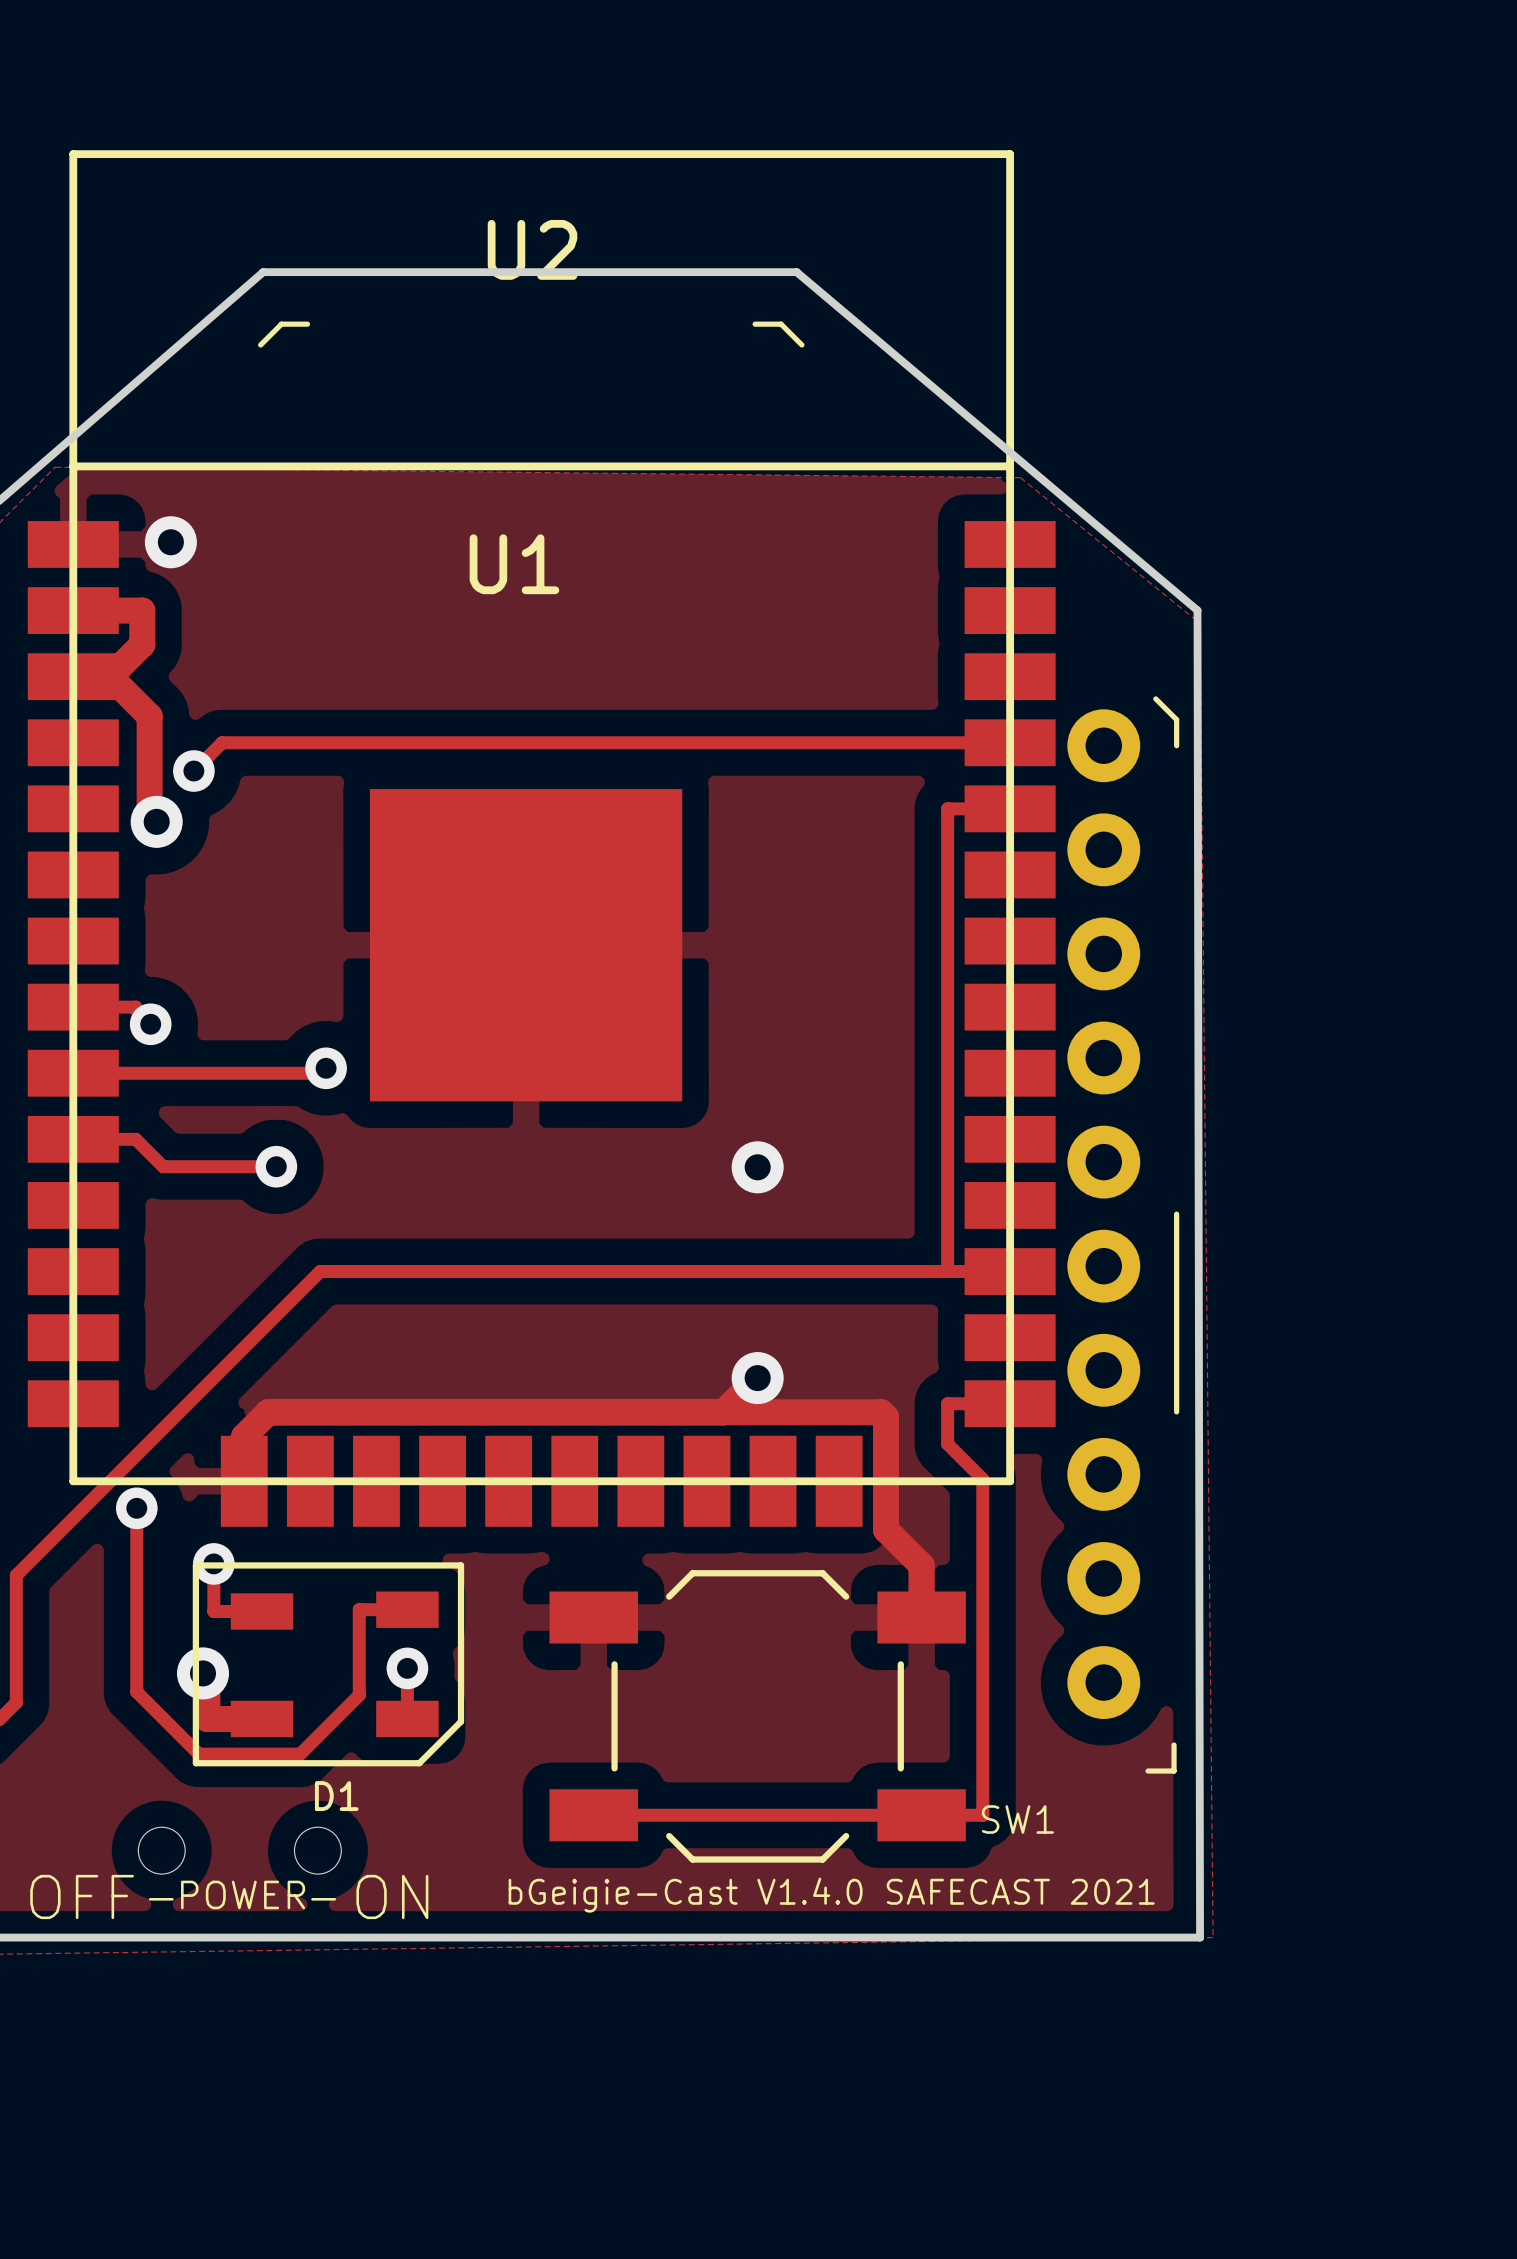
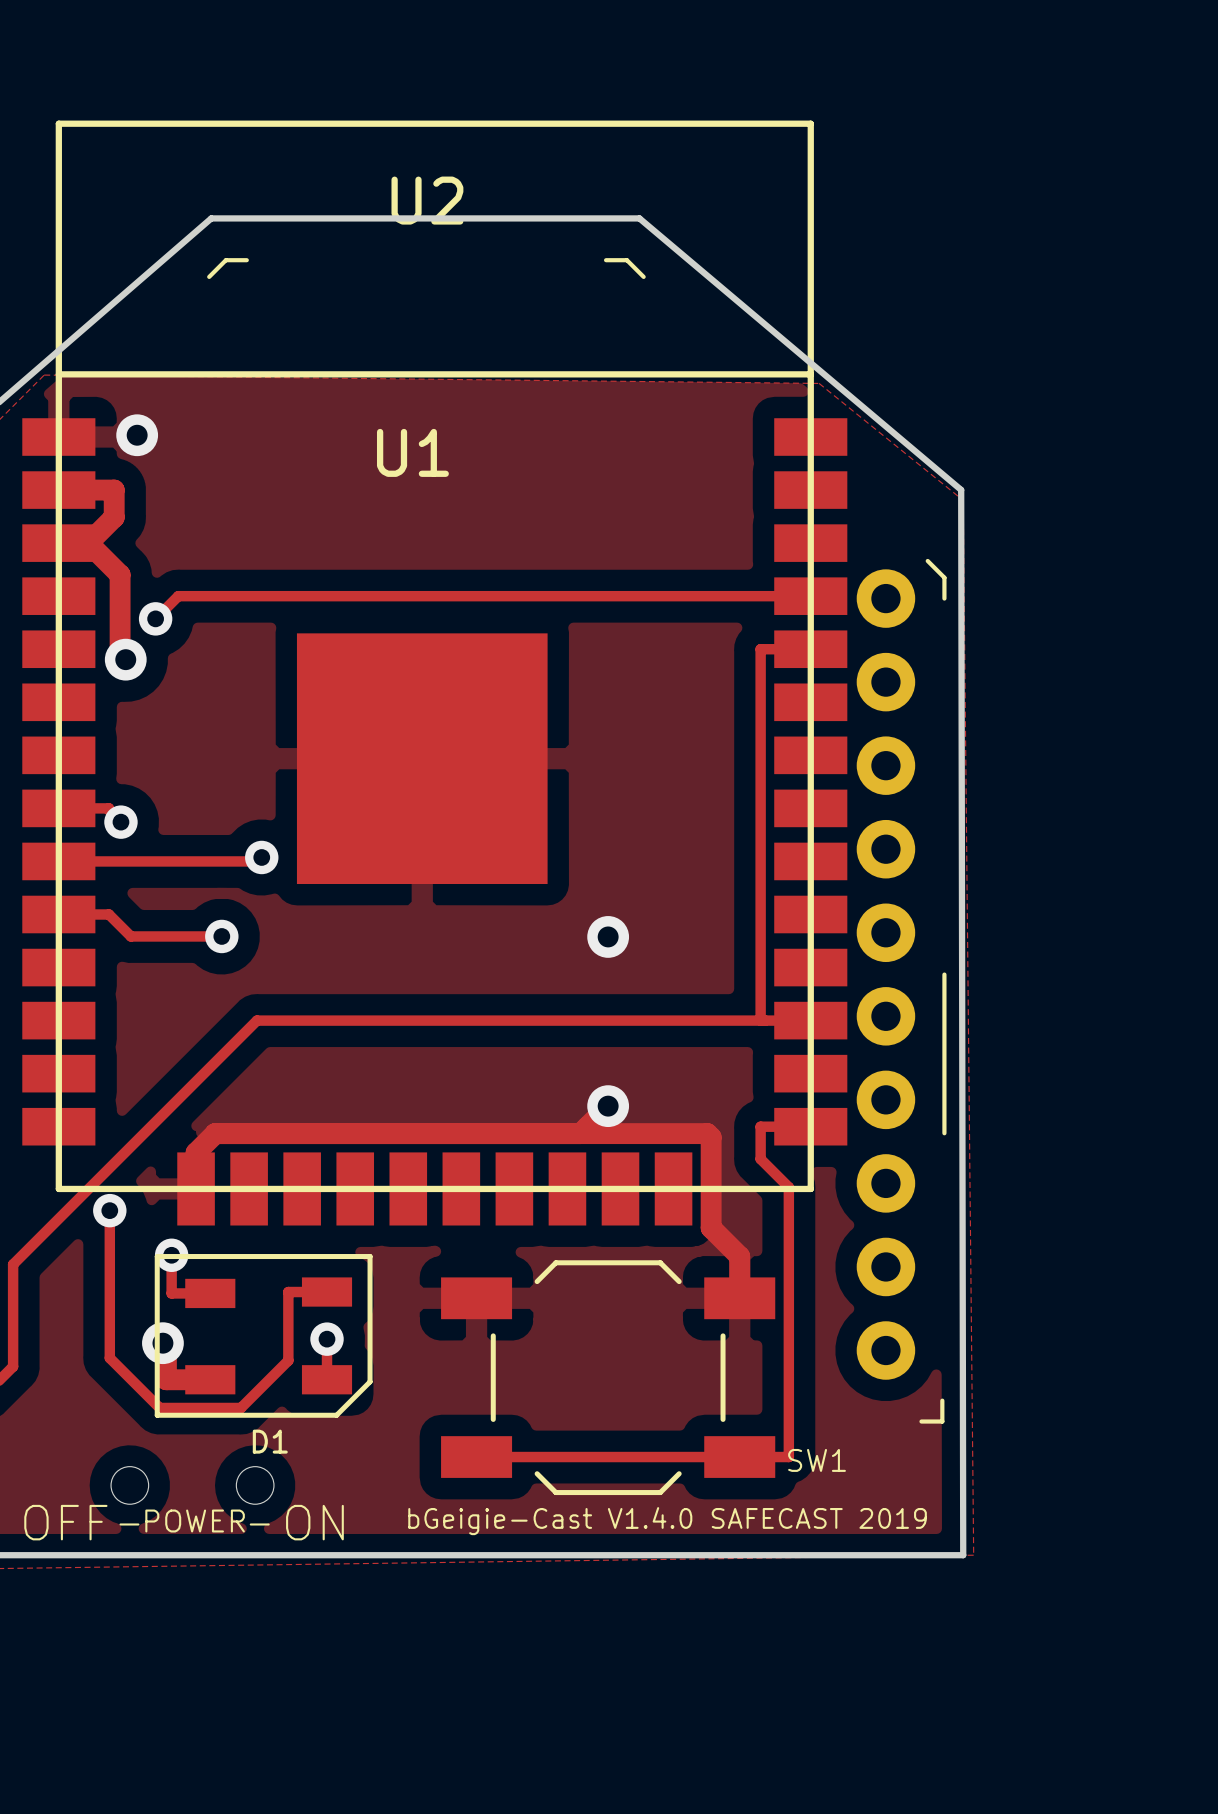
text: bGeigie-Cast V1.4.0 SAFECAST 2021 (831, 1895) -> bGeigie-Cast V1.4.0 SAFECAST 2019 (667, 1521)

